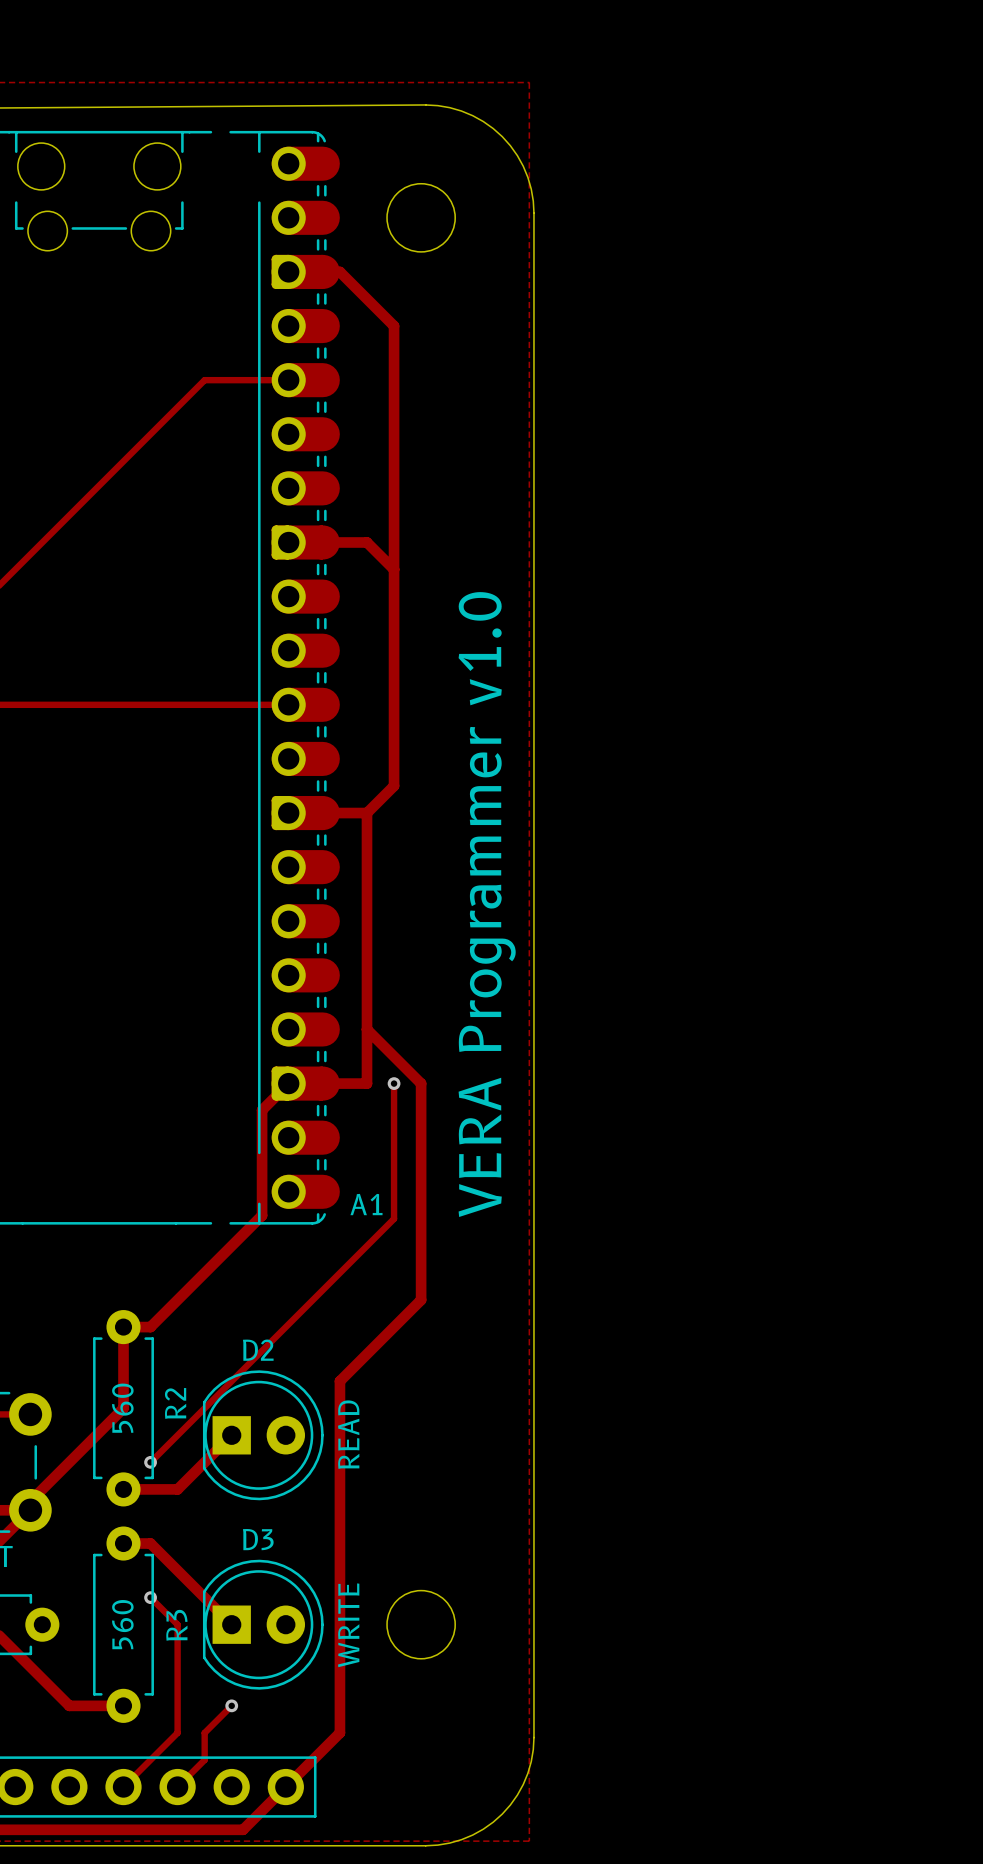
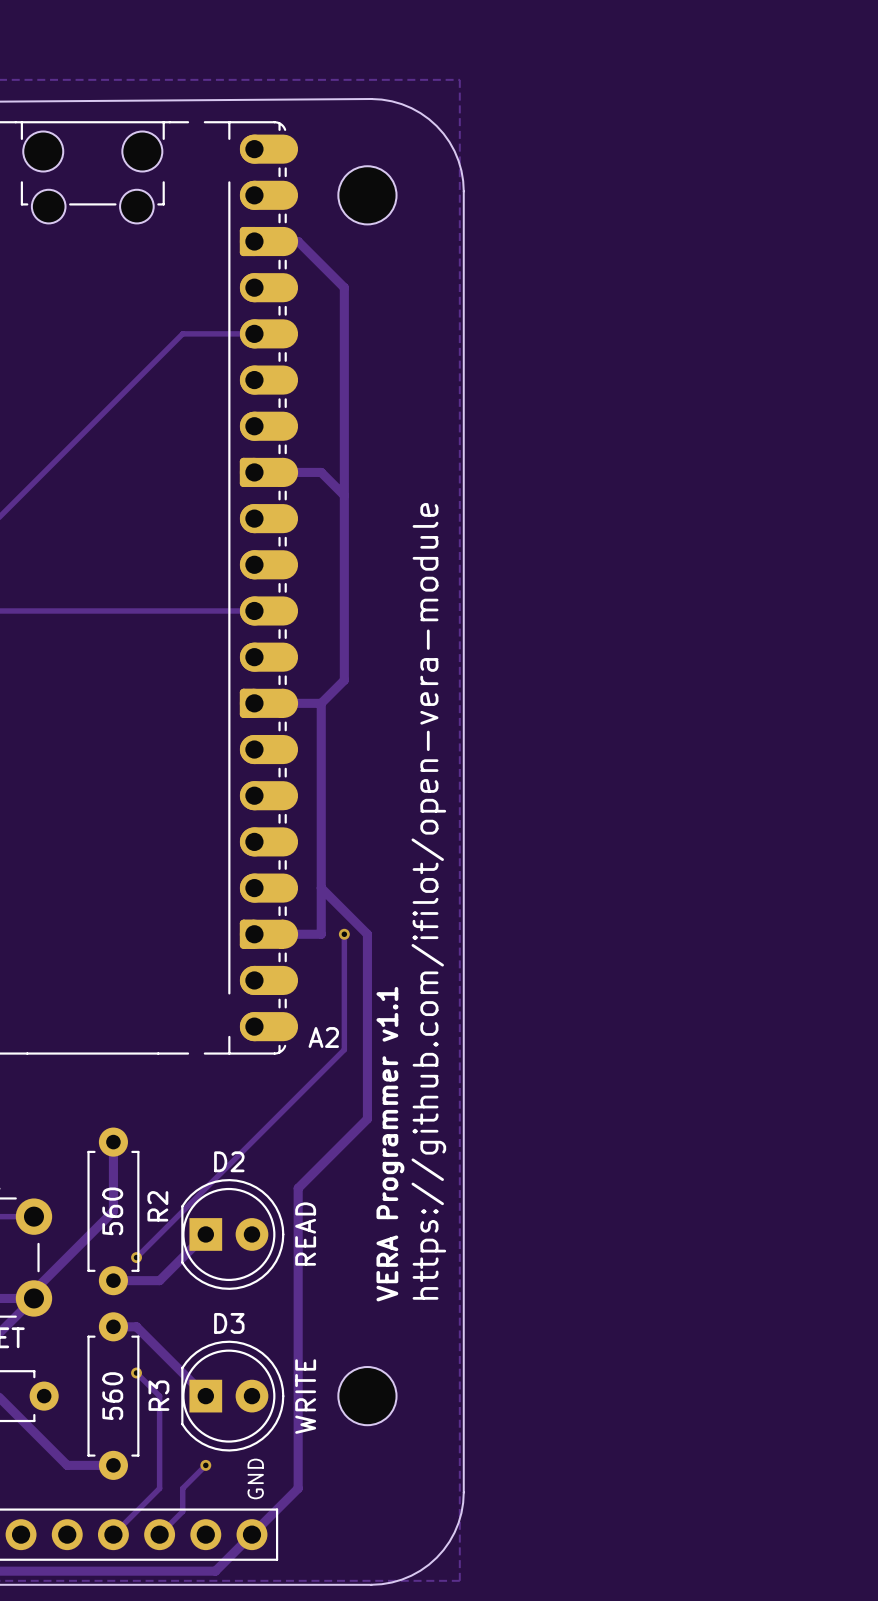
text: VERA Programmer v1.0 (487, 904) -> VERA Programmer v1.1 (390, 1144)
text: none -> https://github.com/ifilot/open-vera-module (428, 901)
track: (288, 1083) (262, 1110) (262, 1215) (150, 1327) (123, 1327) -> none
A1 name: A1 (366, 1204) -> A2 (323, 1037)
text: none -> GND (255, 1478)

